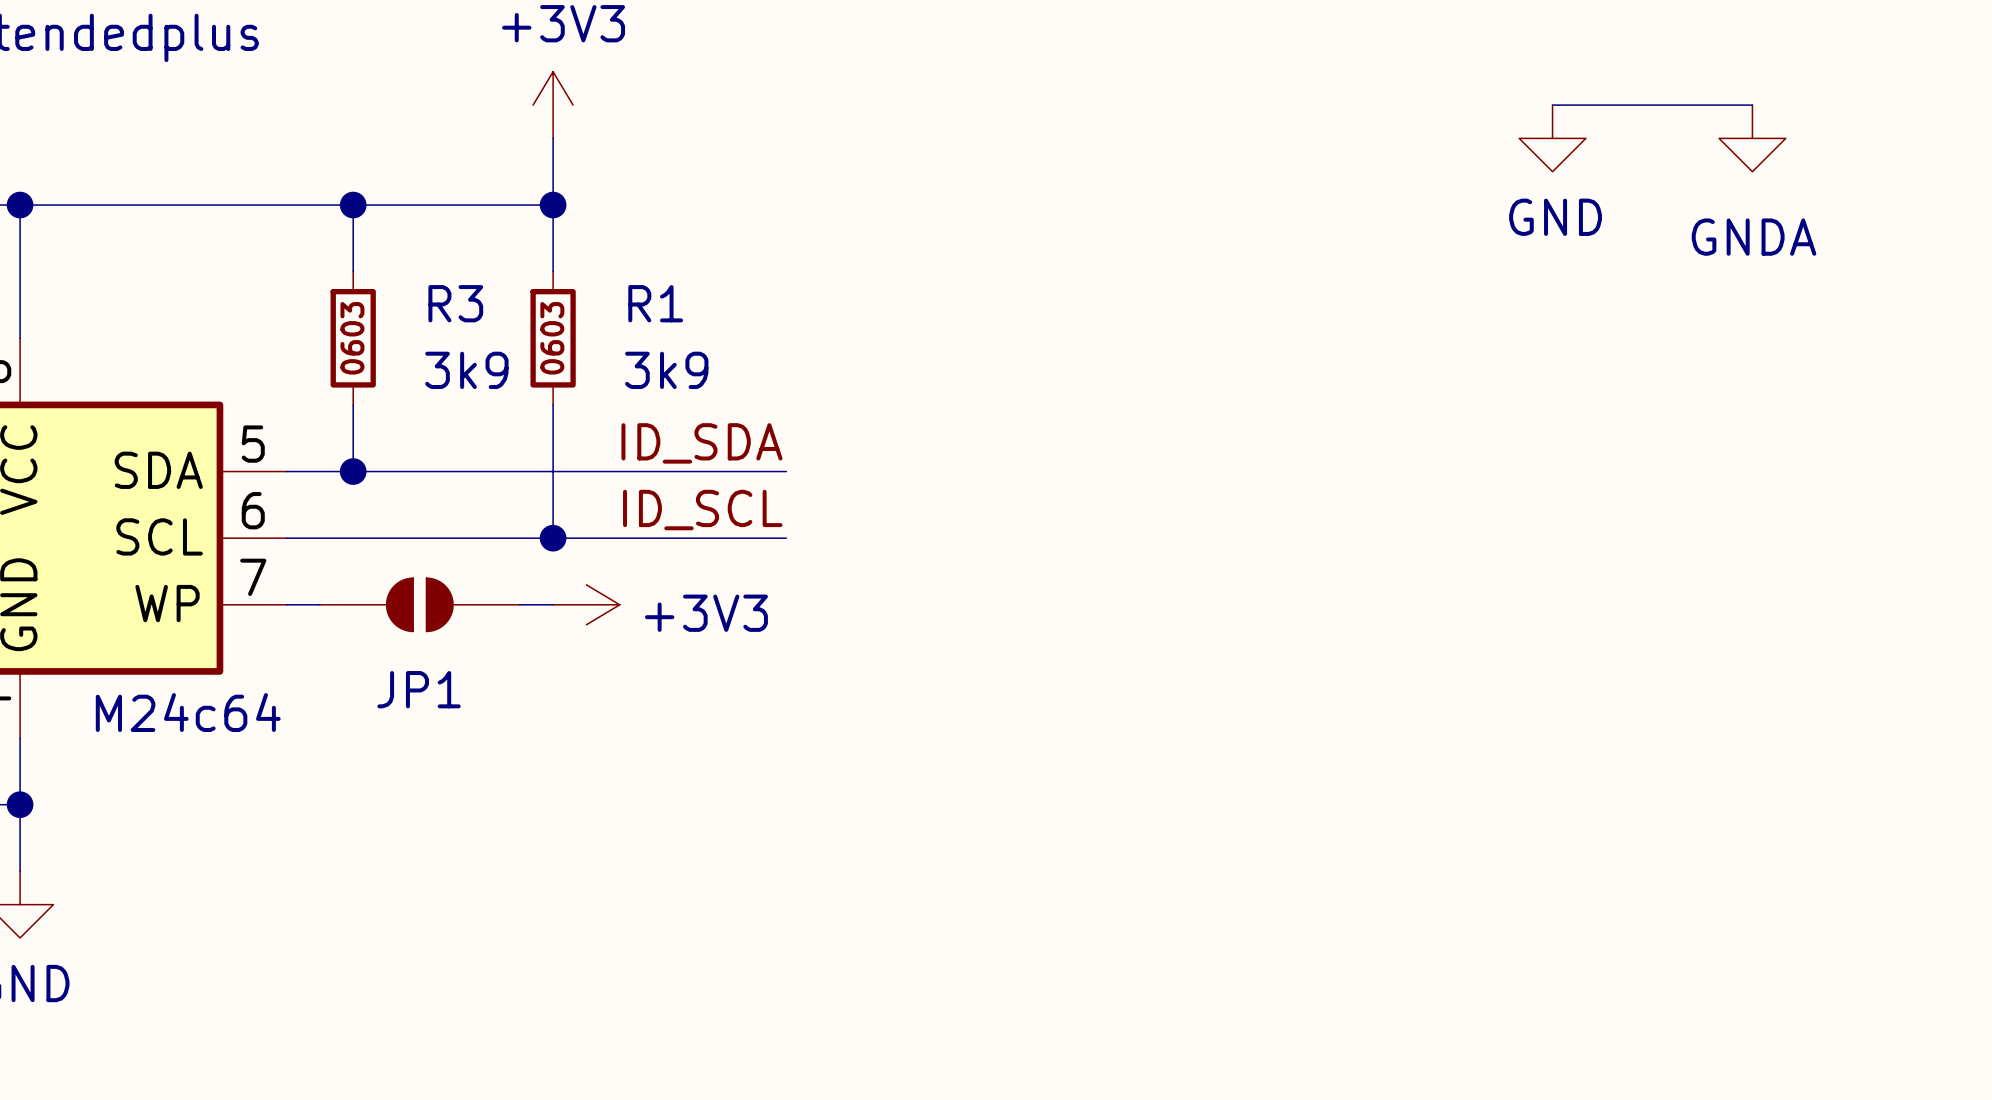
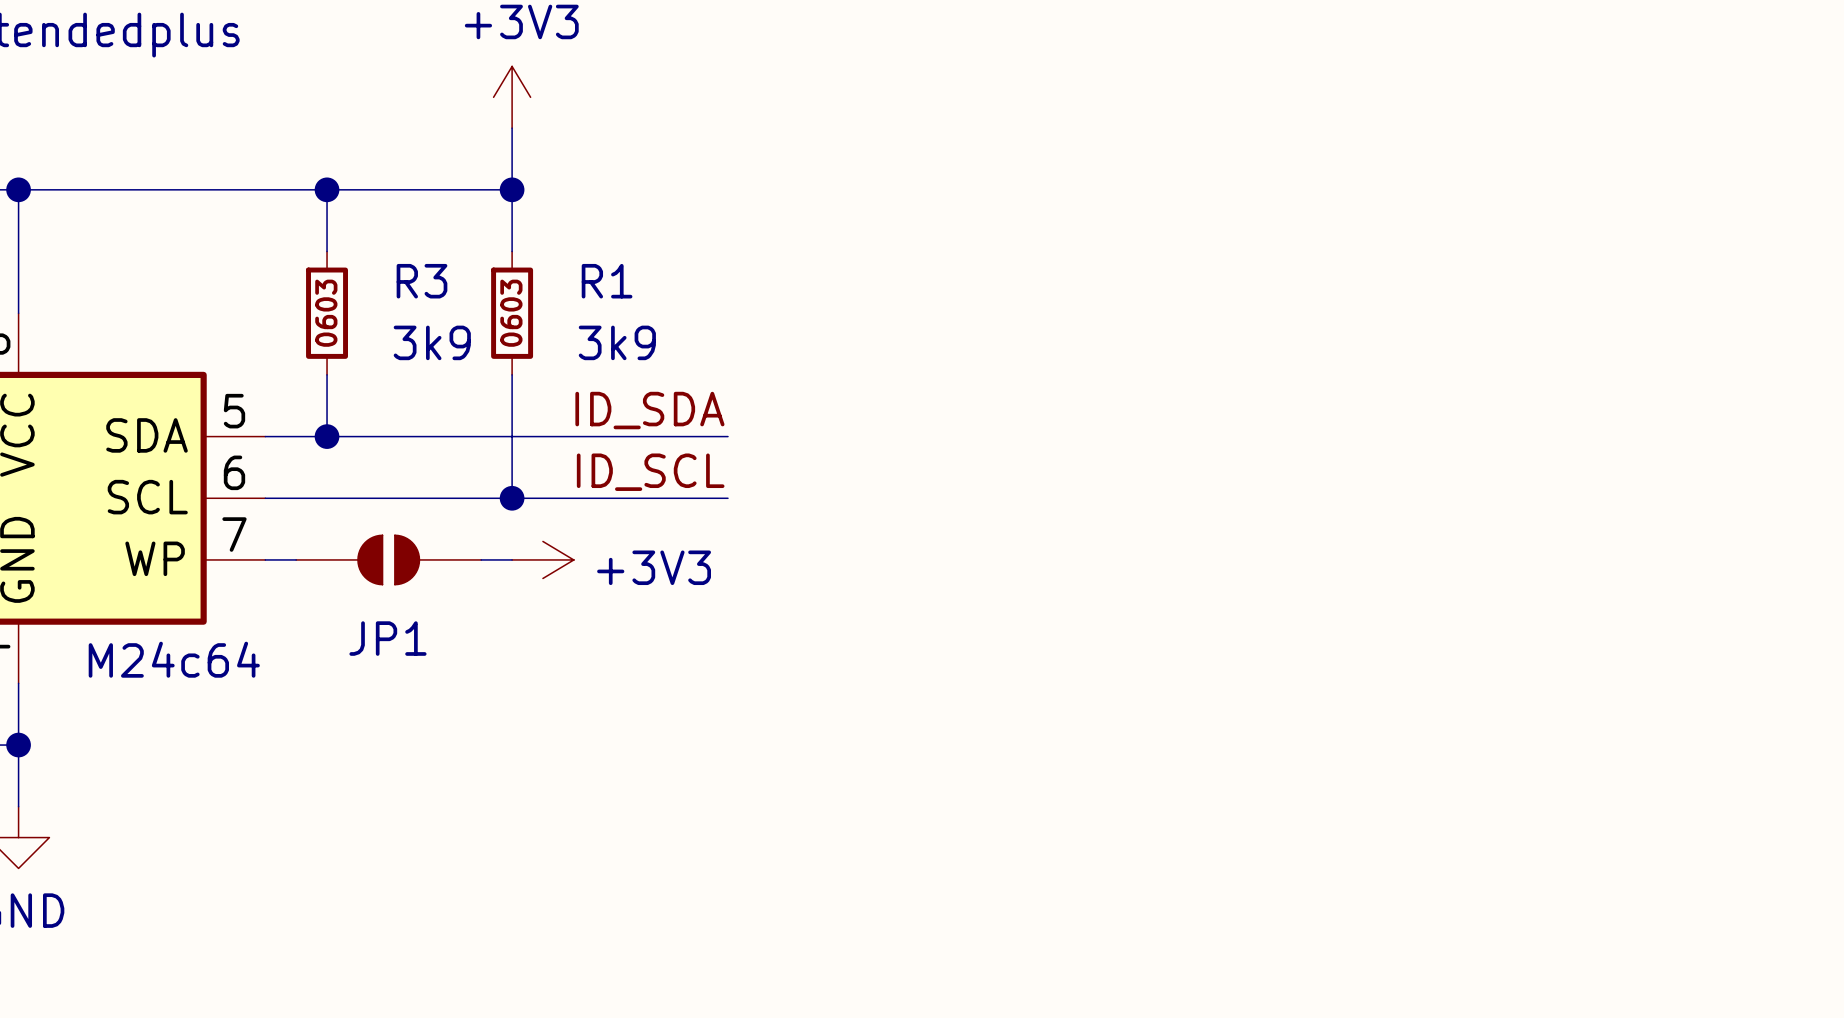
wire: (1552, 105) (1752, 105) -> none
power symbol: GND (1552, 138) -> none
power symbol: GNDA (1752, 138) -> none

